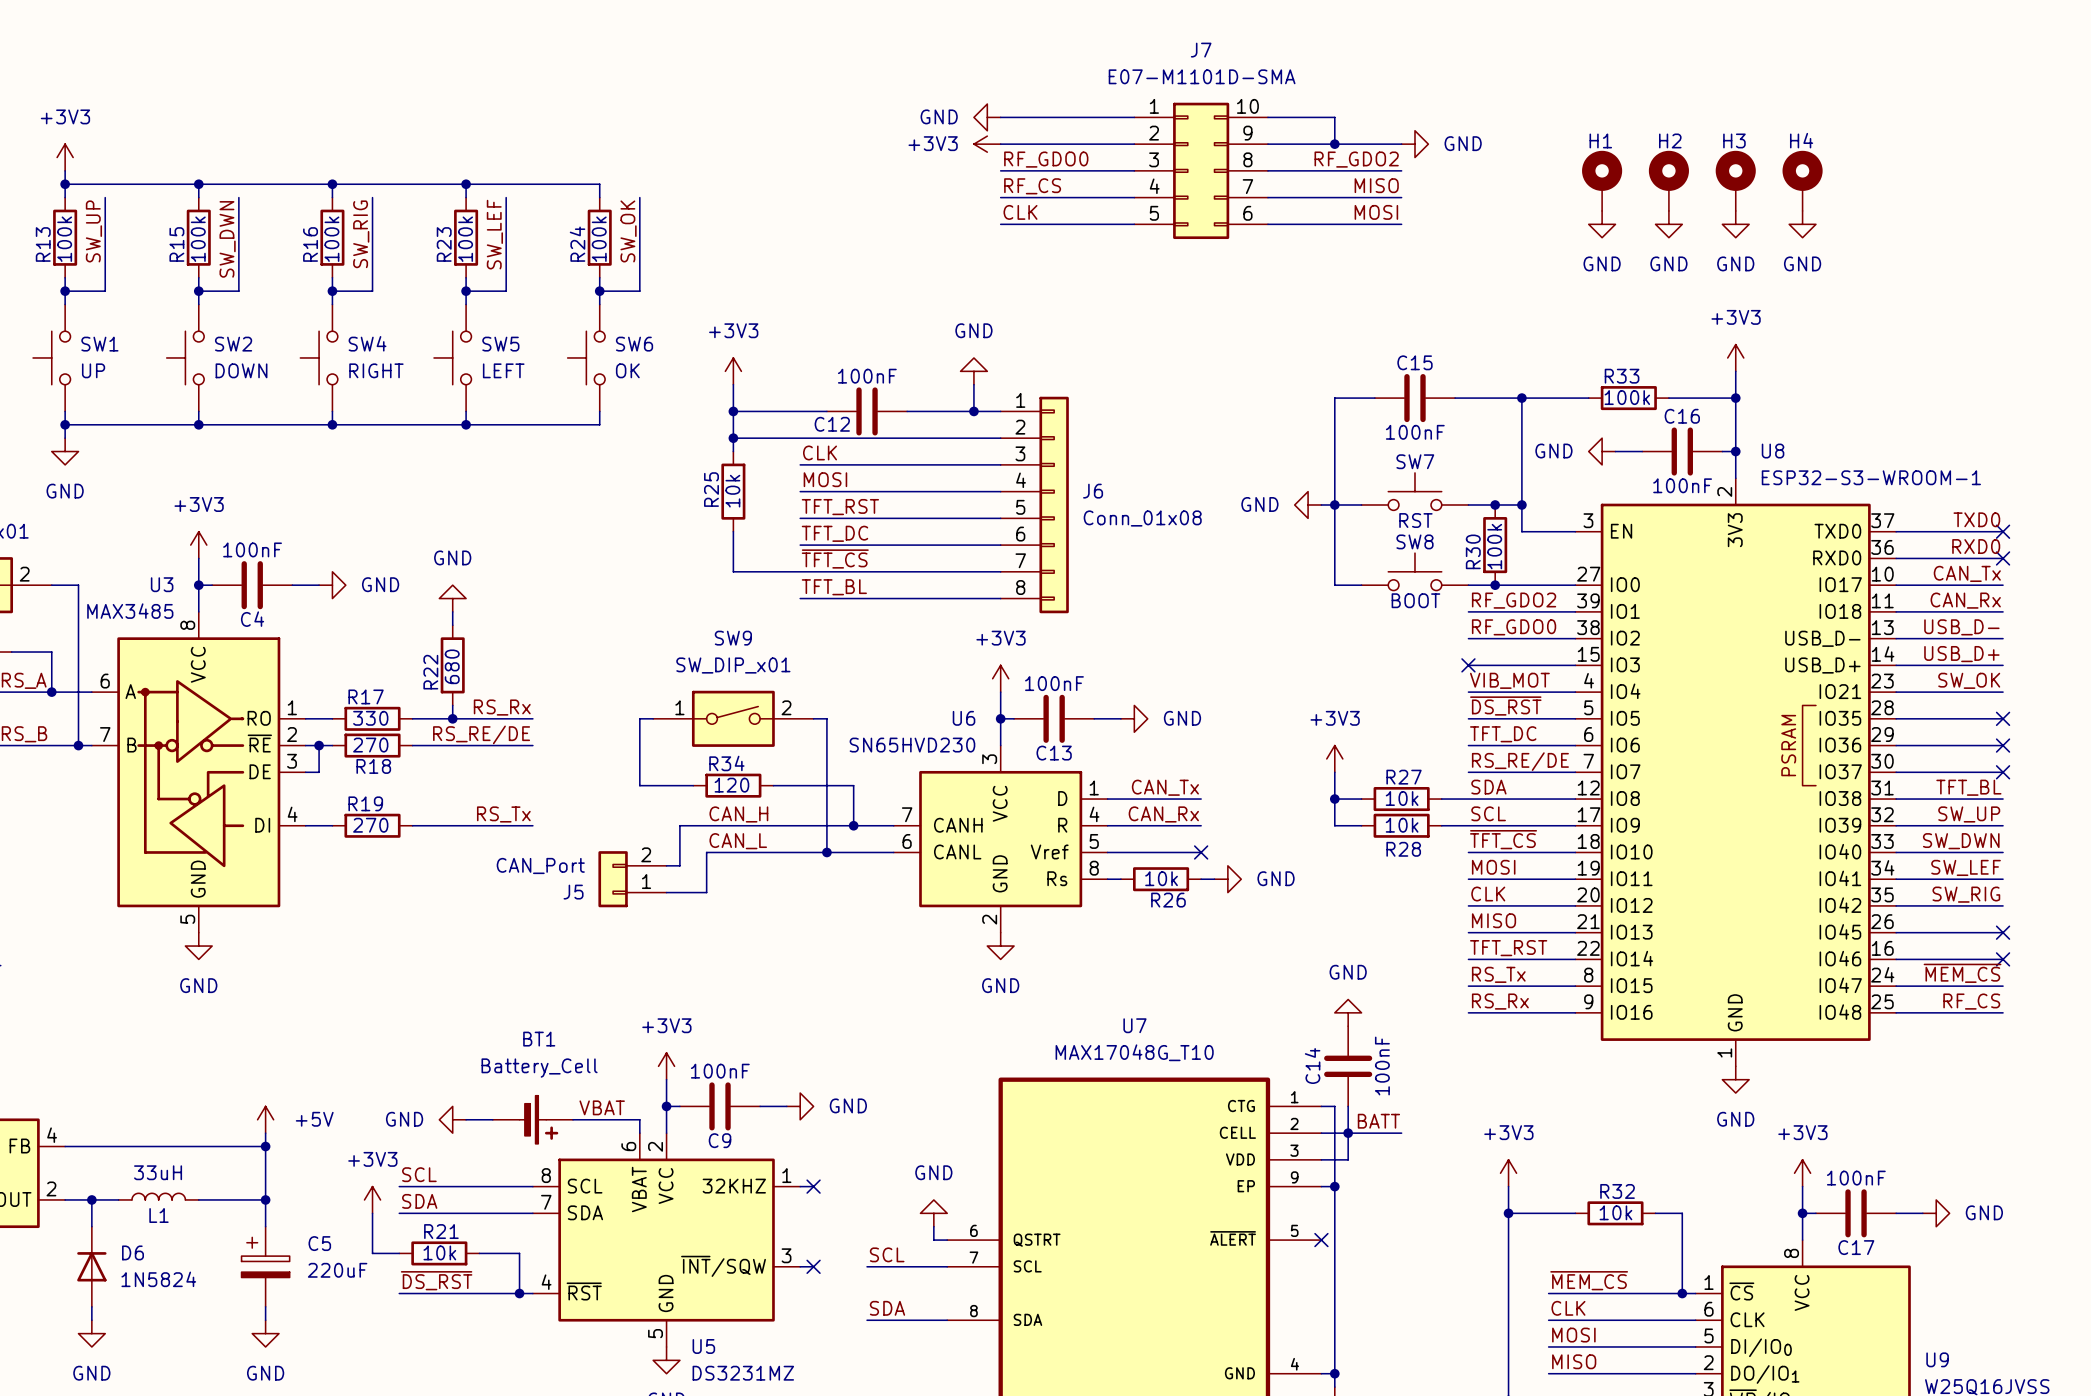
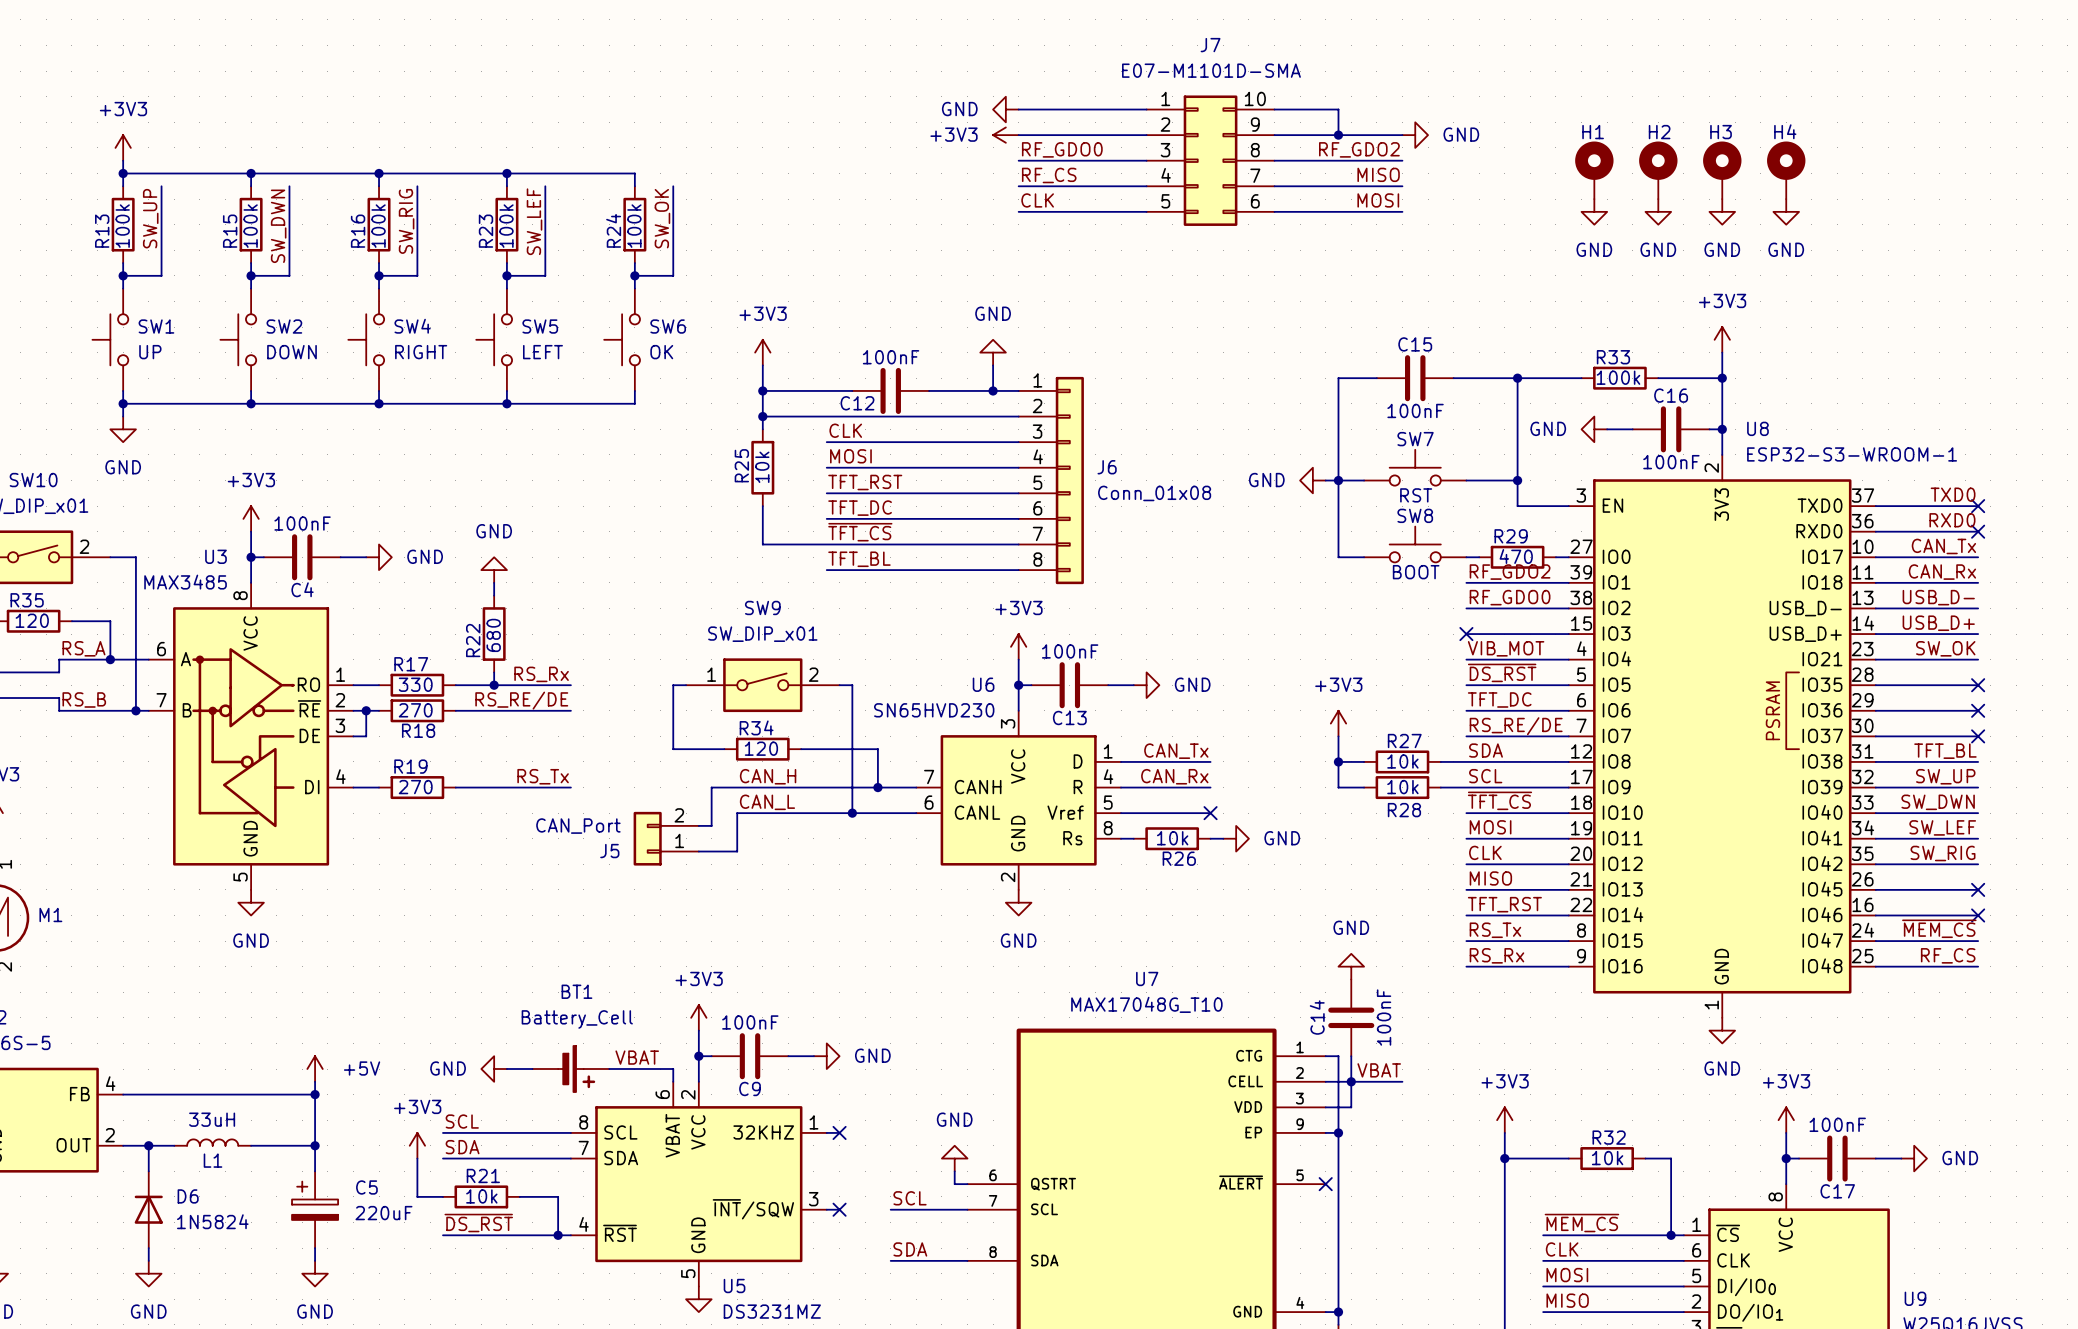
junction: (1495, 504) -> none
R30: 100k (1495, 545) -> none
wire: (1481, 585) (1562, 585) -> none
junction: (1495, 585) -> none
R29: none -> 470 (1517, 557)
label: BATT (1378, 1121) -> VBAT (1379, 1070)

